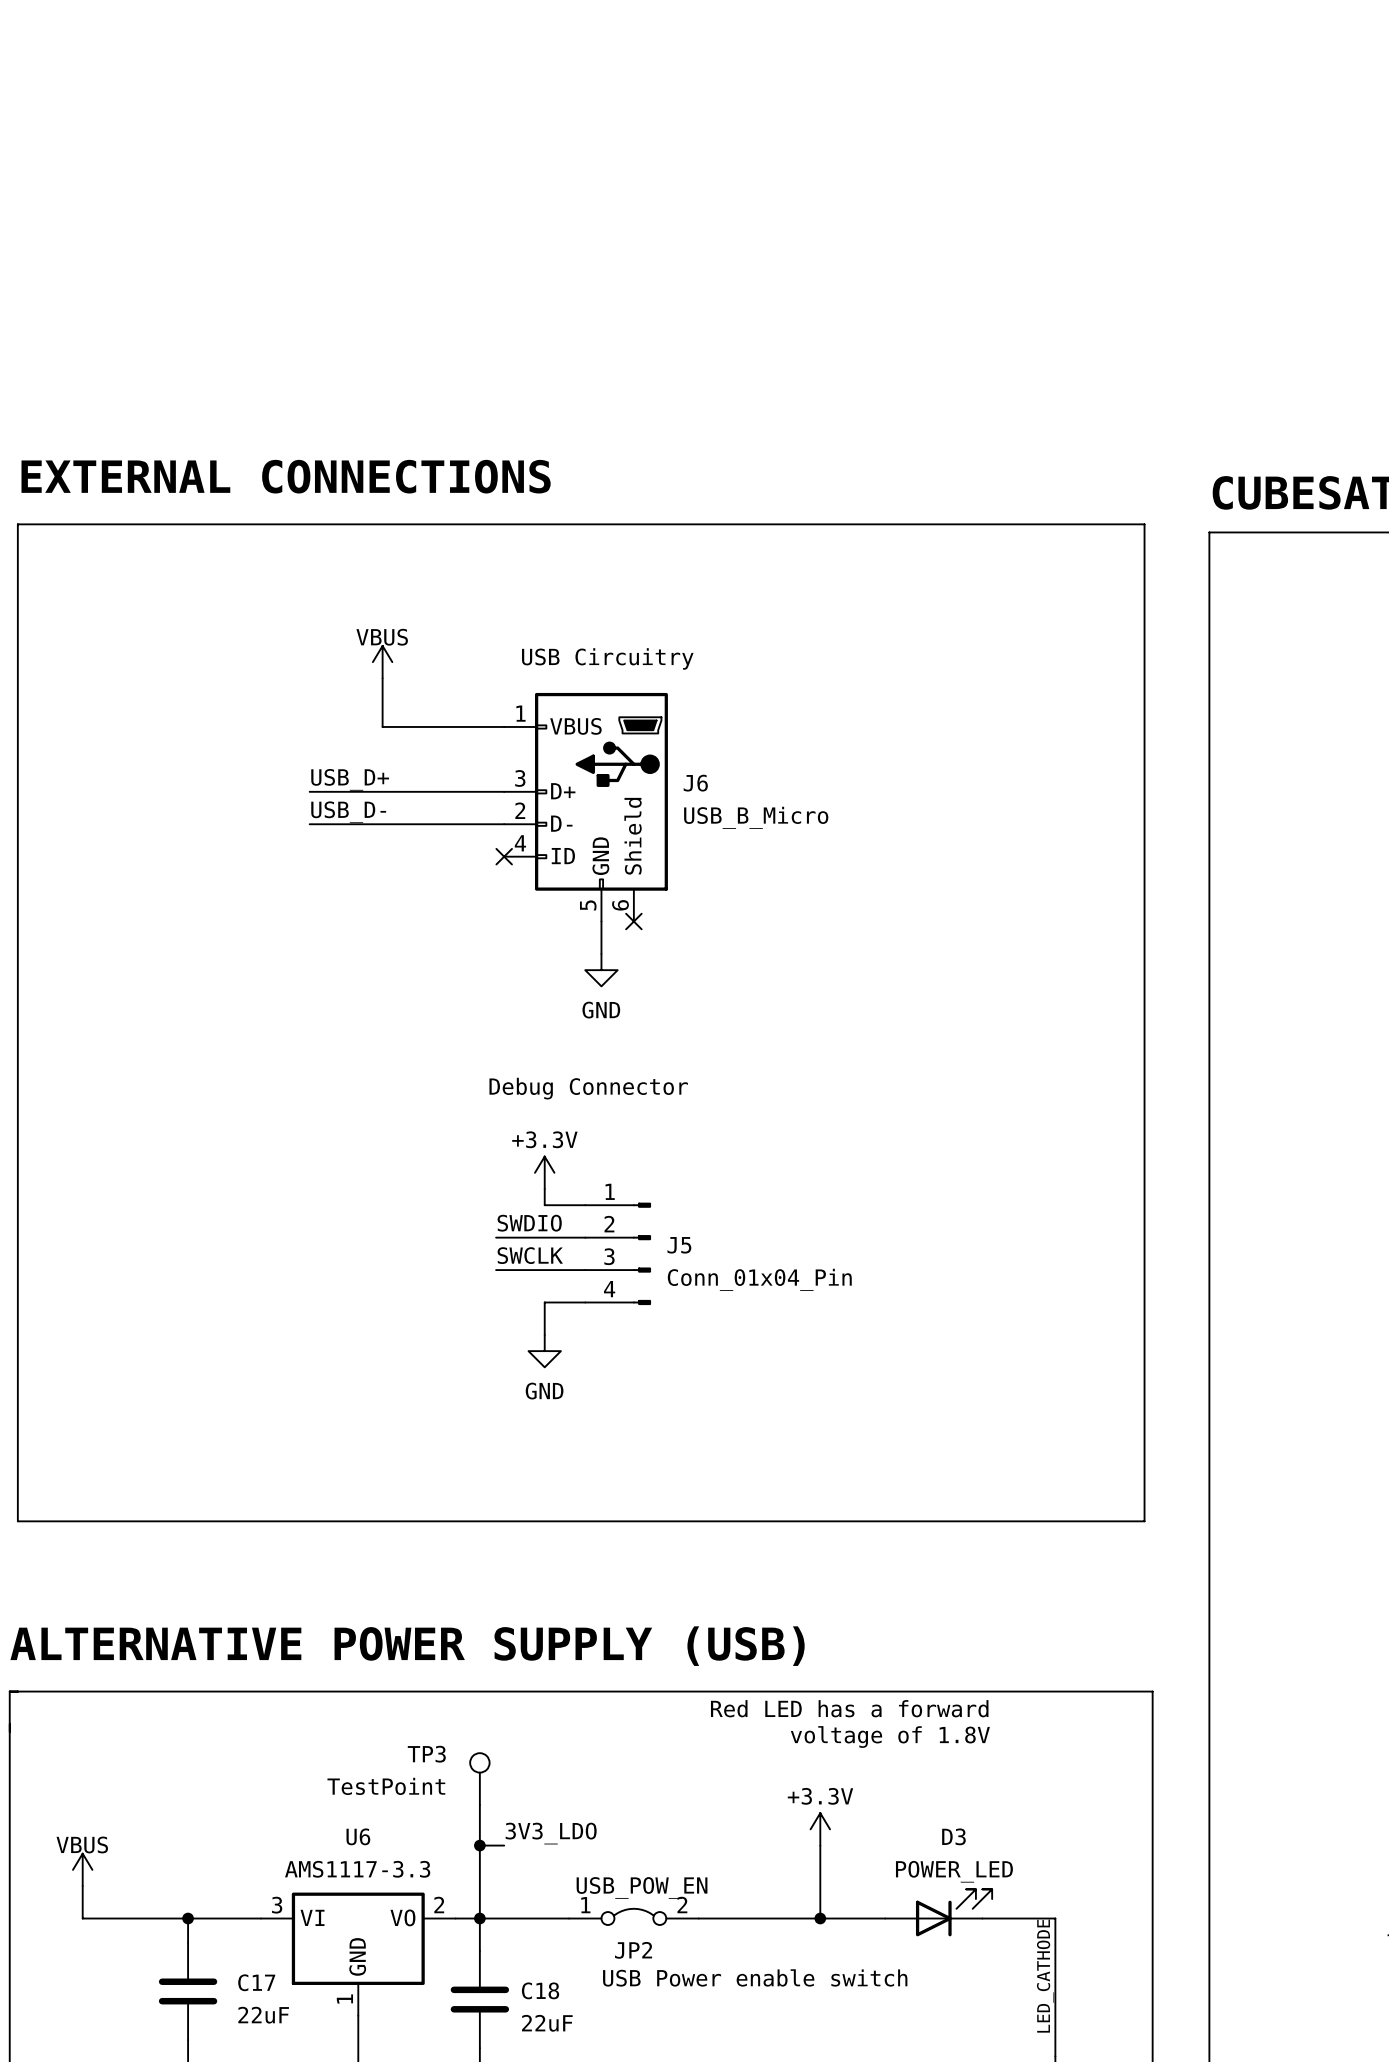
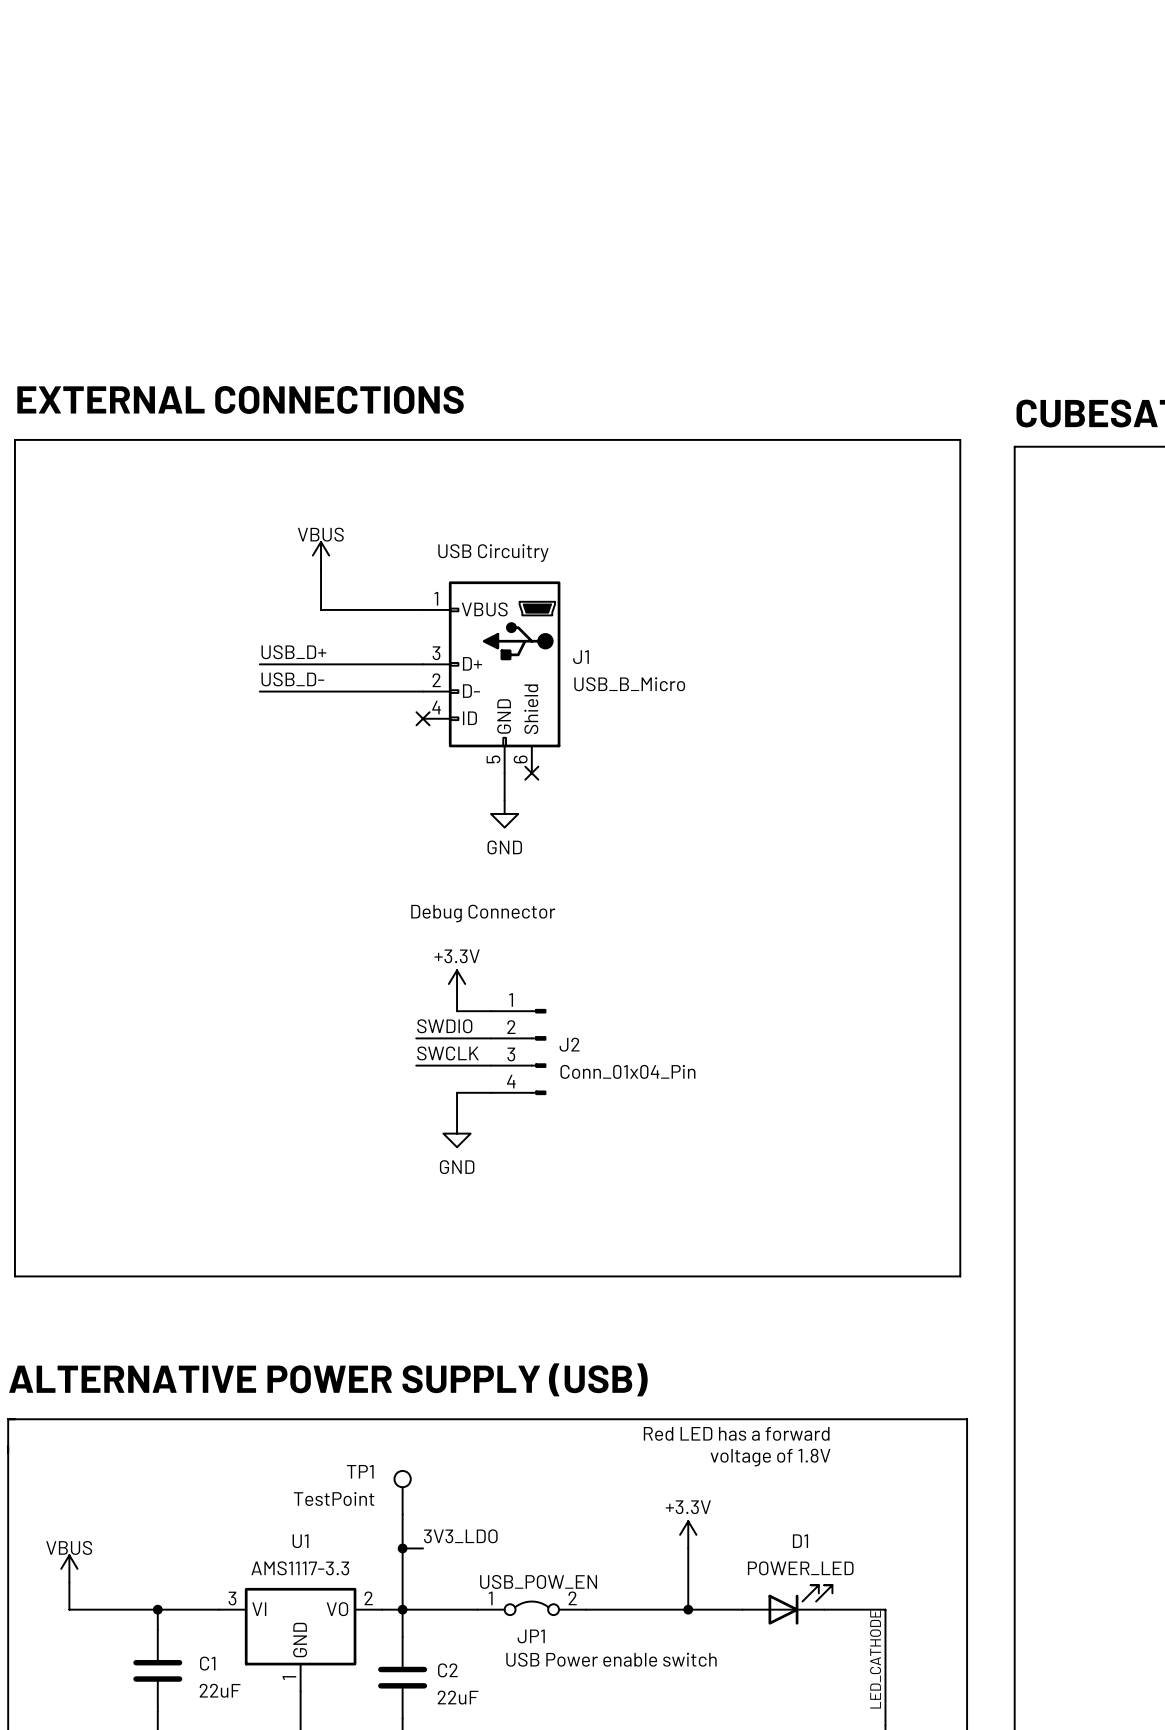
J6 name: J6 (695, 783) -> J1 (581, 657)
J5 name: J5 (679, 1245) -> J2 (569, 1044)
TP3 name: TP3 (426, 1754) -> TP1 (360, 1471)
U6 name: U6 (358, 1836) -> U1 (300, 1541)
D3 name: D3 (953, 1836) -> D1 (800, 1541)
JP2 name: JP2 (633, 1950) -> JP1 (531, 1636)
C17 name: C17 (256, 1982) -> C1 (207, 1663)
C18 name: C18 (540, 1990) -> C2 (447, 1670)

